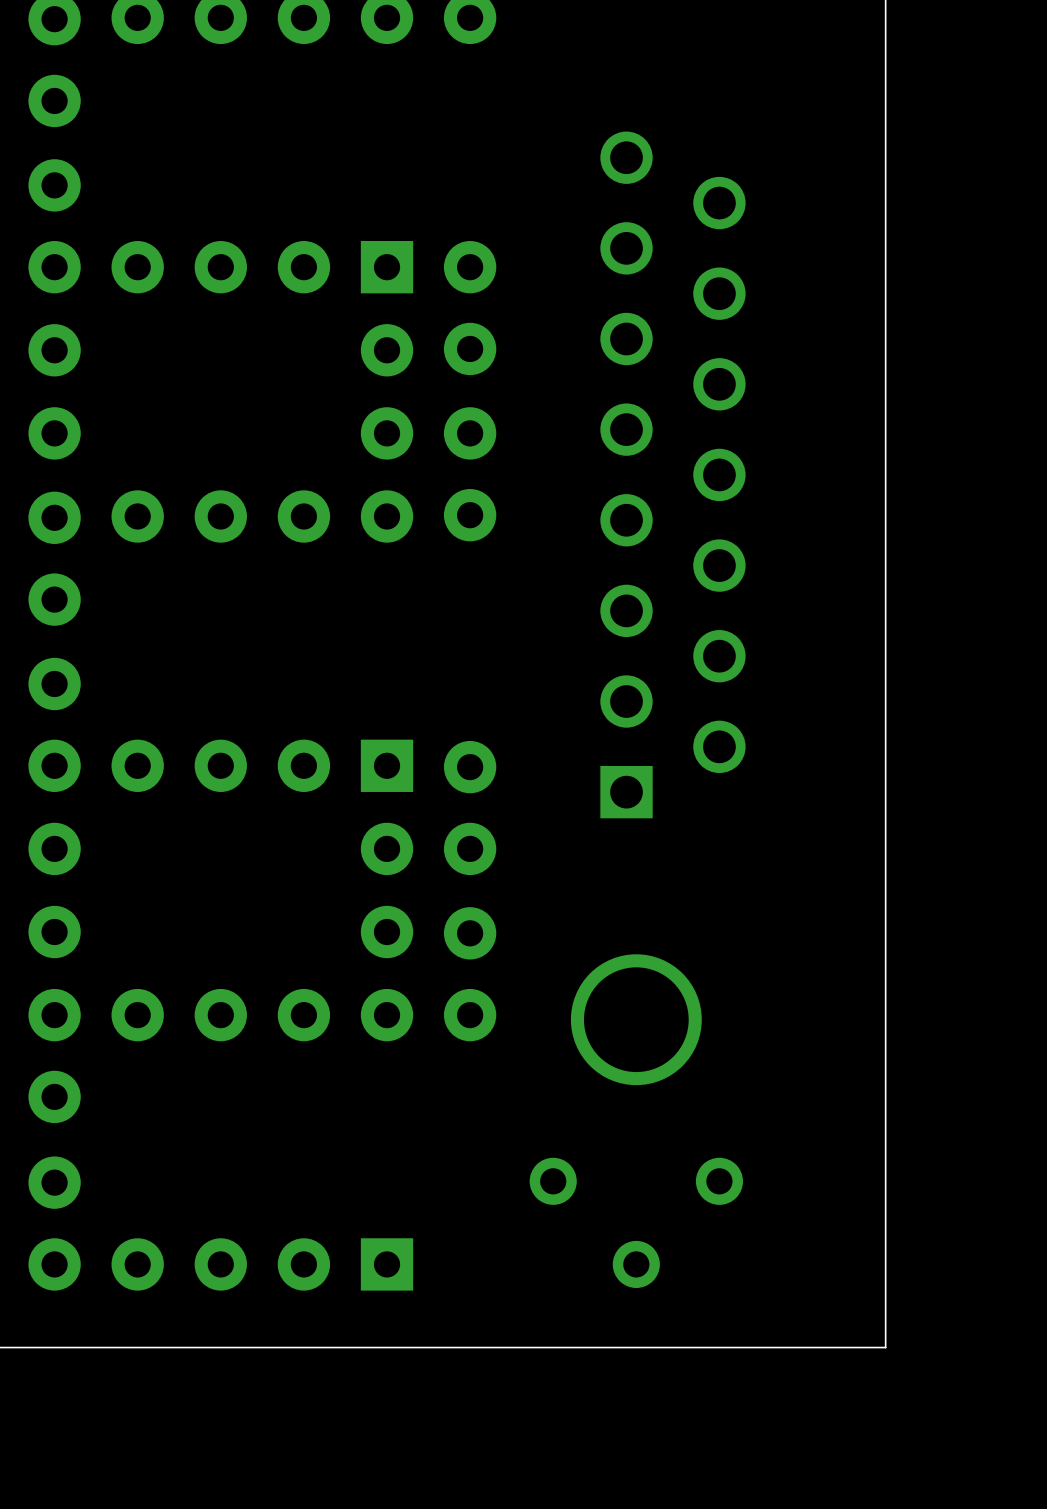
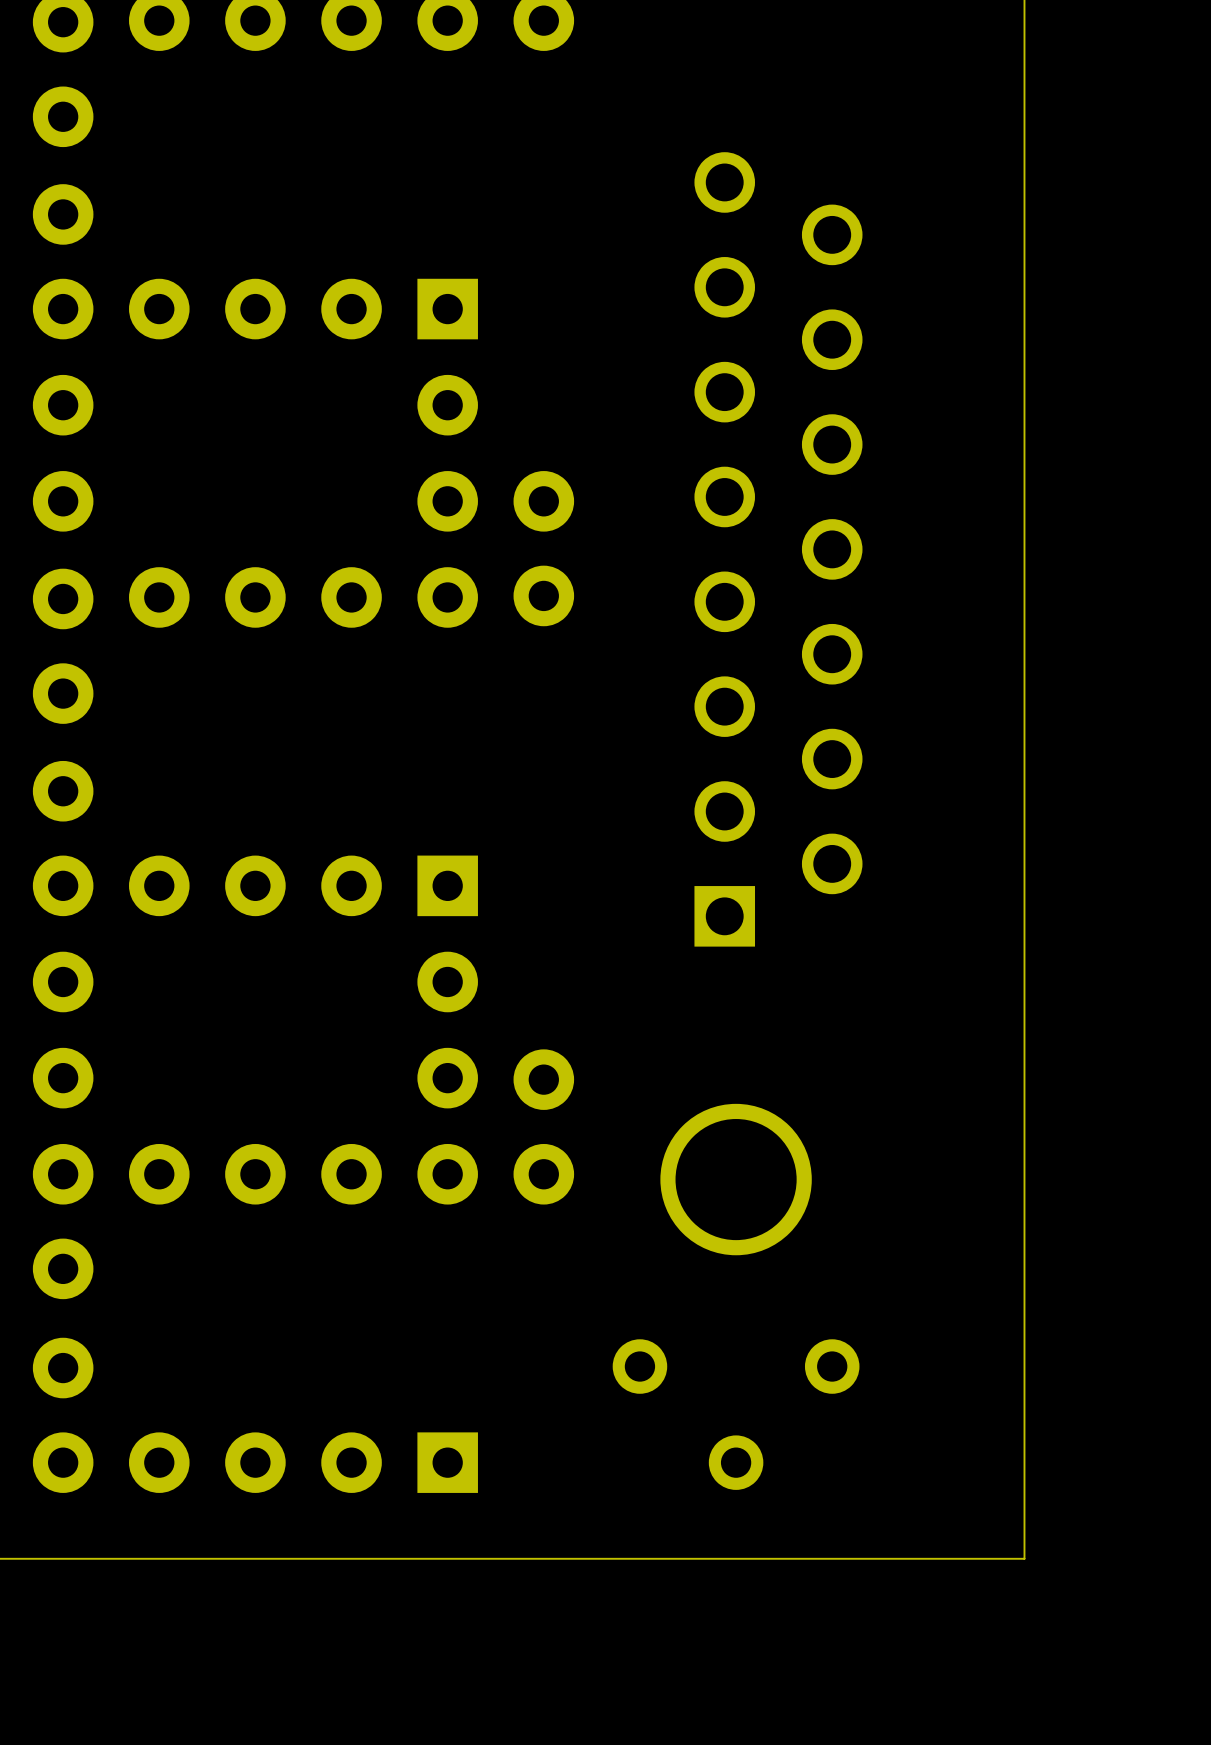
part: (470, 308) -> none
part: (470, 808) -> none

